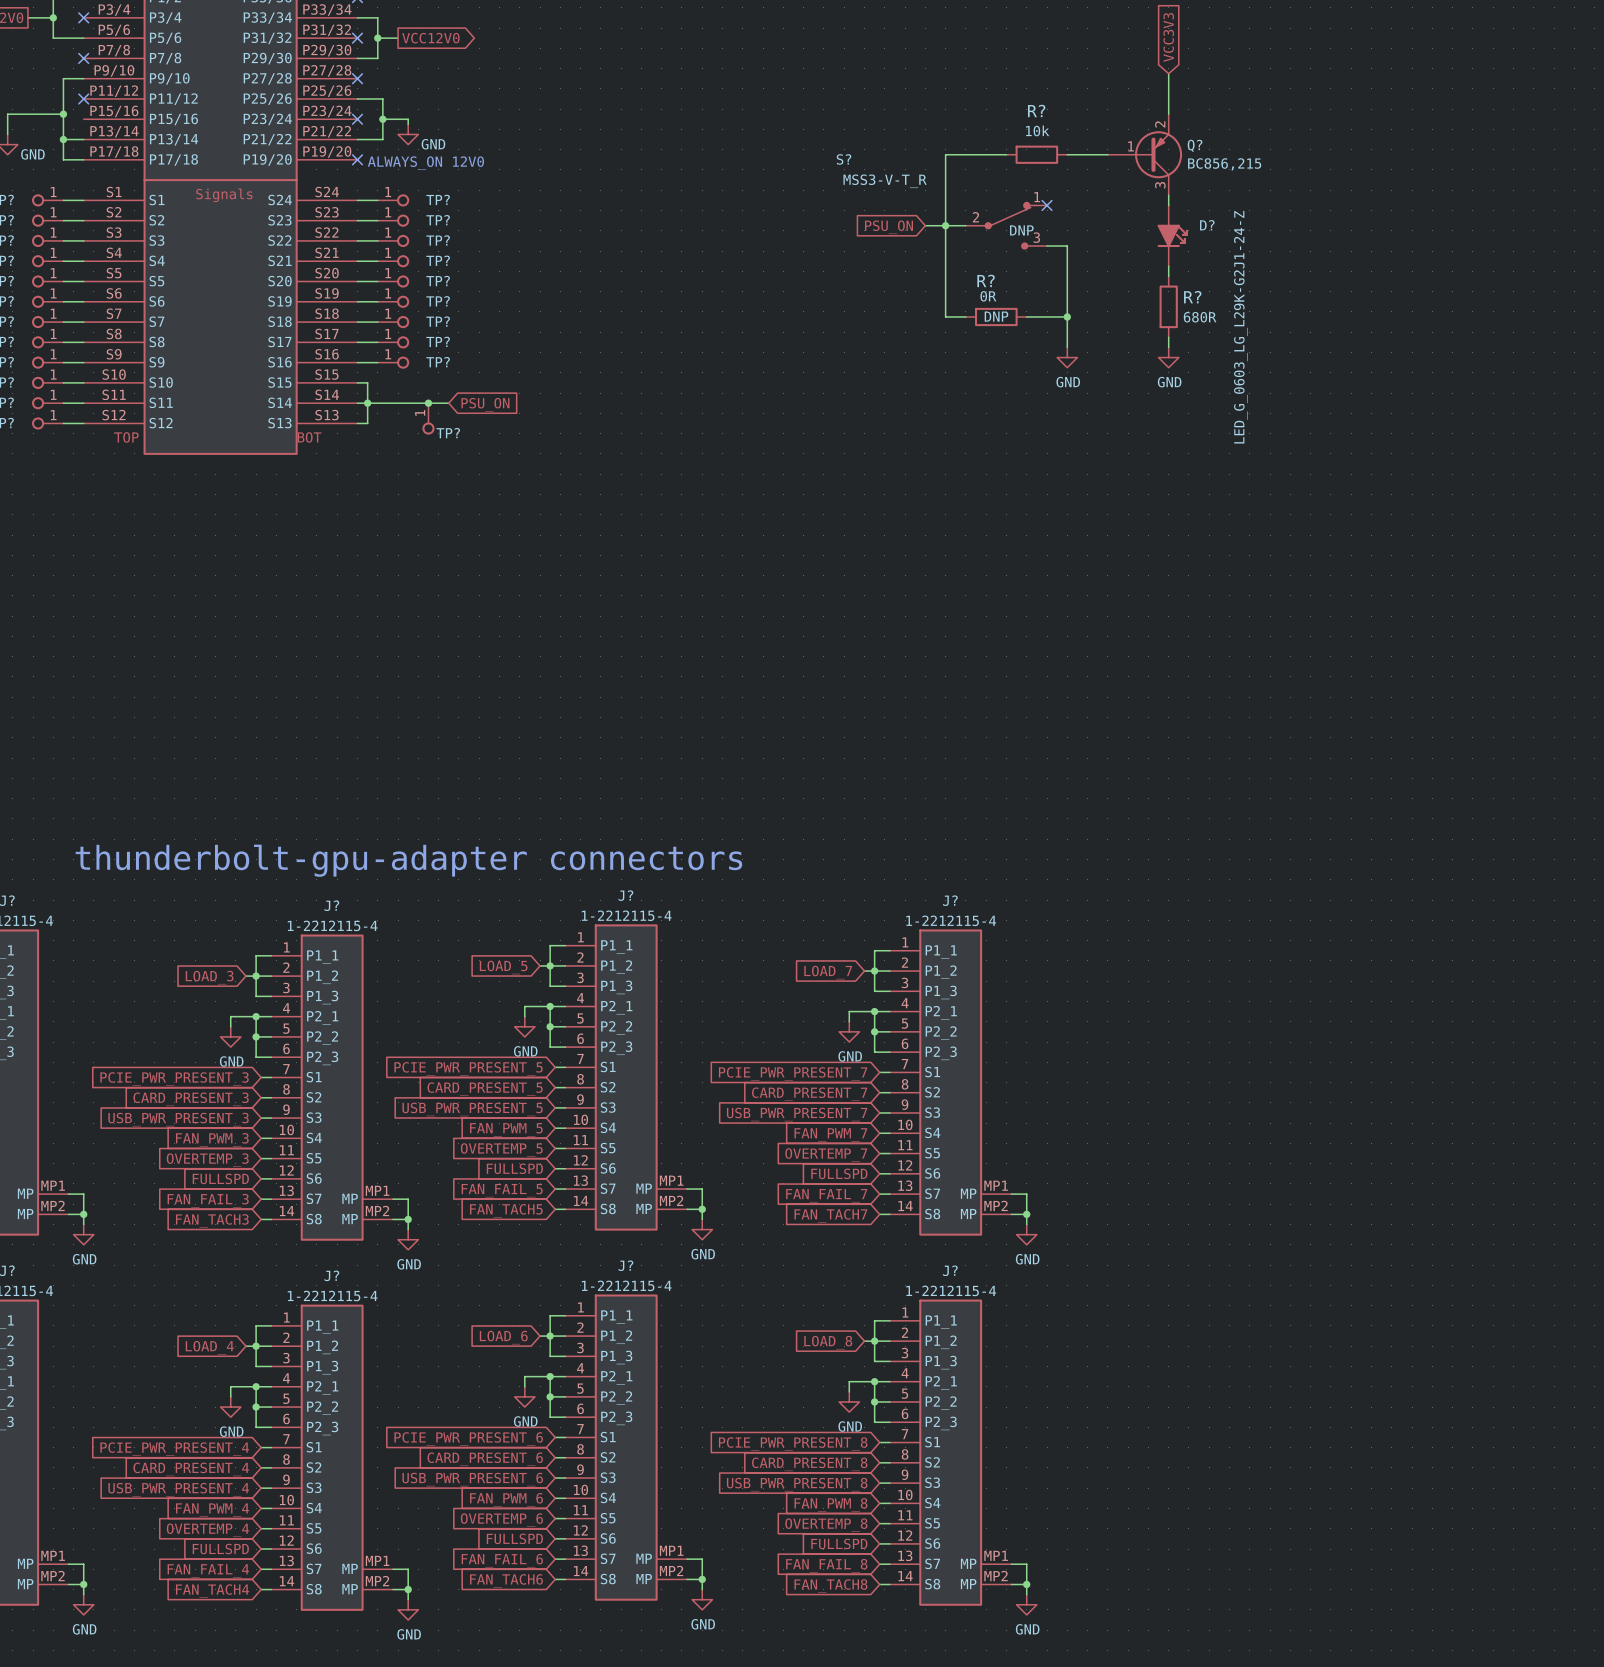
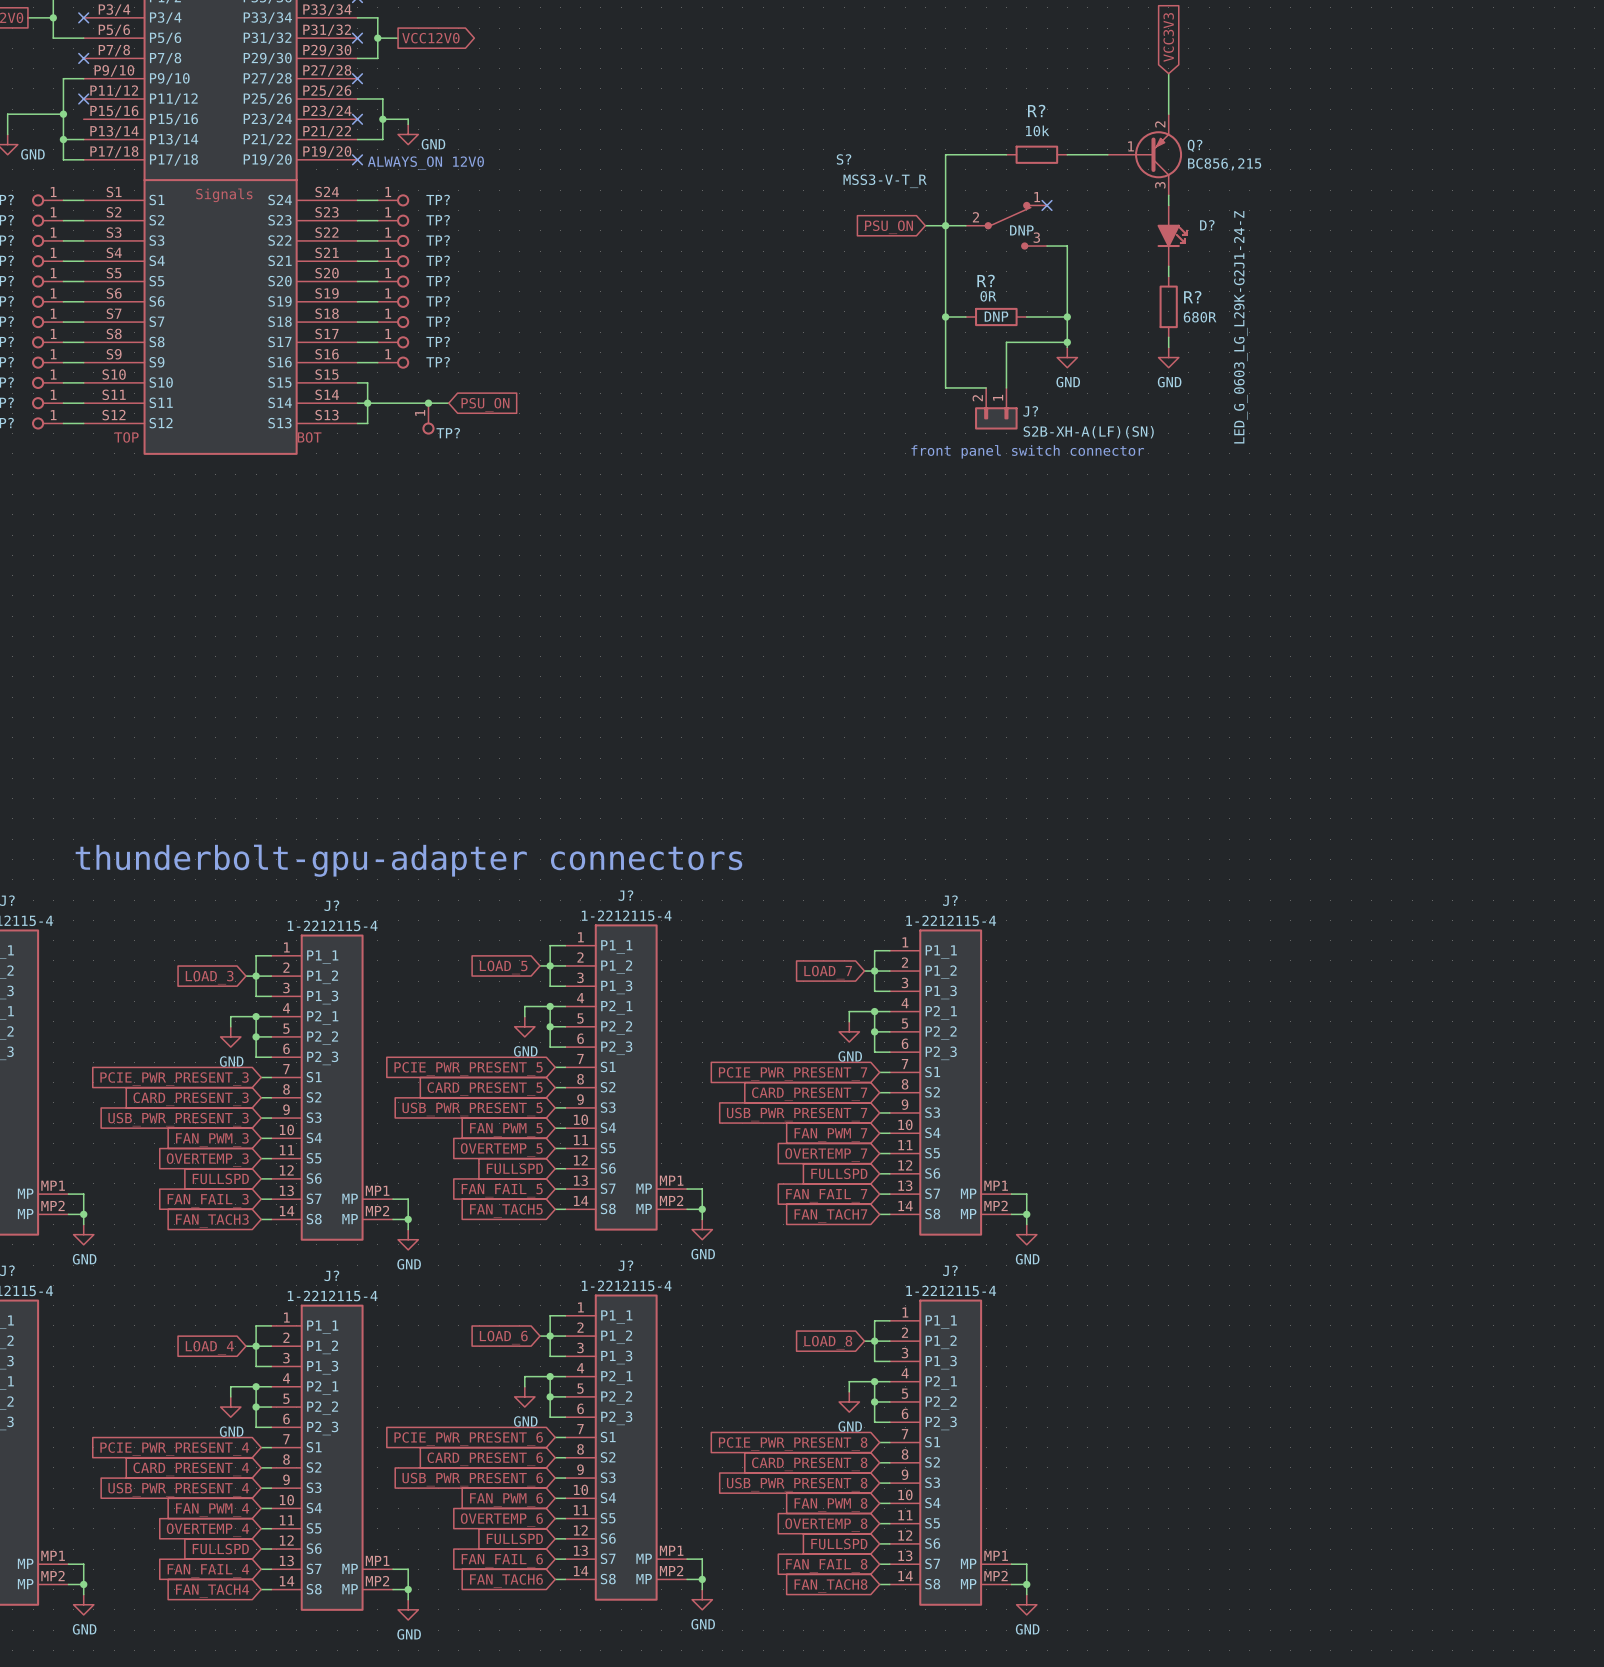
wire: none -> (945, 316) (945, 387) (986, 387)
junction: none -> (945, 316)
wire: none -> (1067, 342) (1006, 342) (1006, 387)
junction: none -> (1067, 342)
J?: none -> (996, 408)
text: none -> front panel switch connector (1027, 451)

